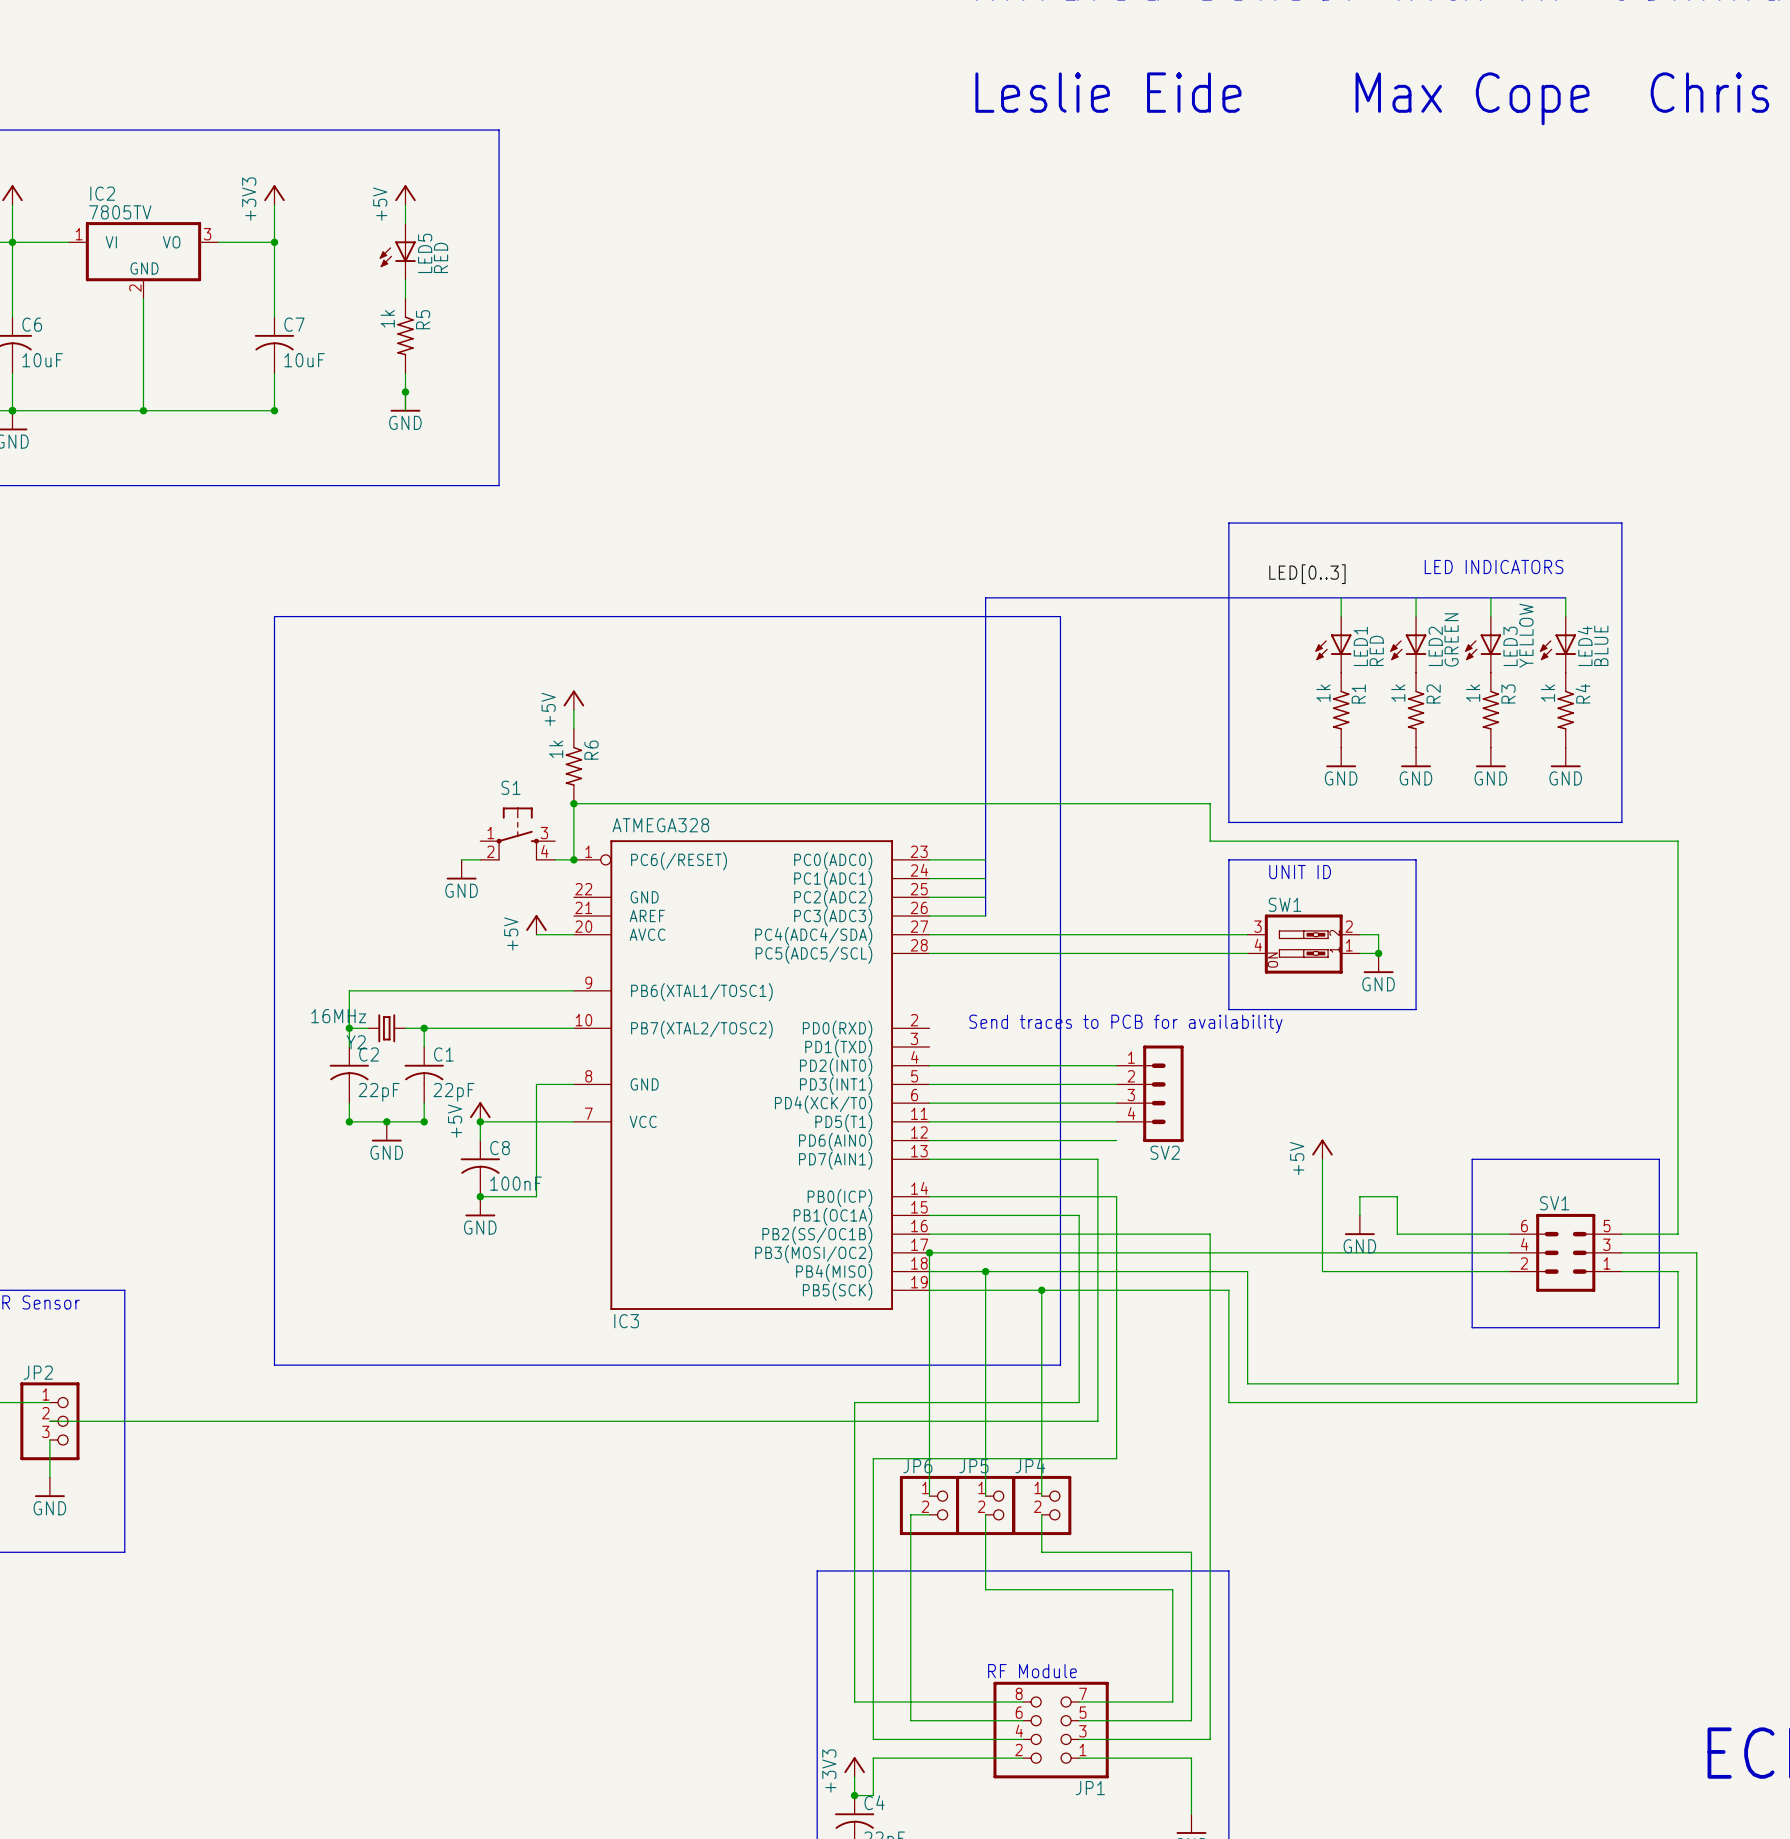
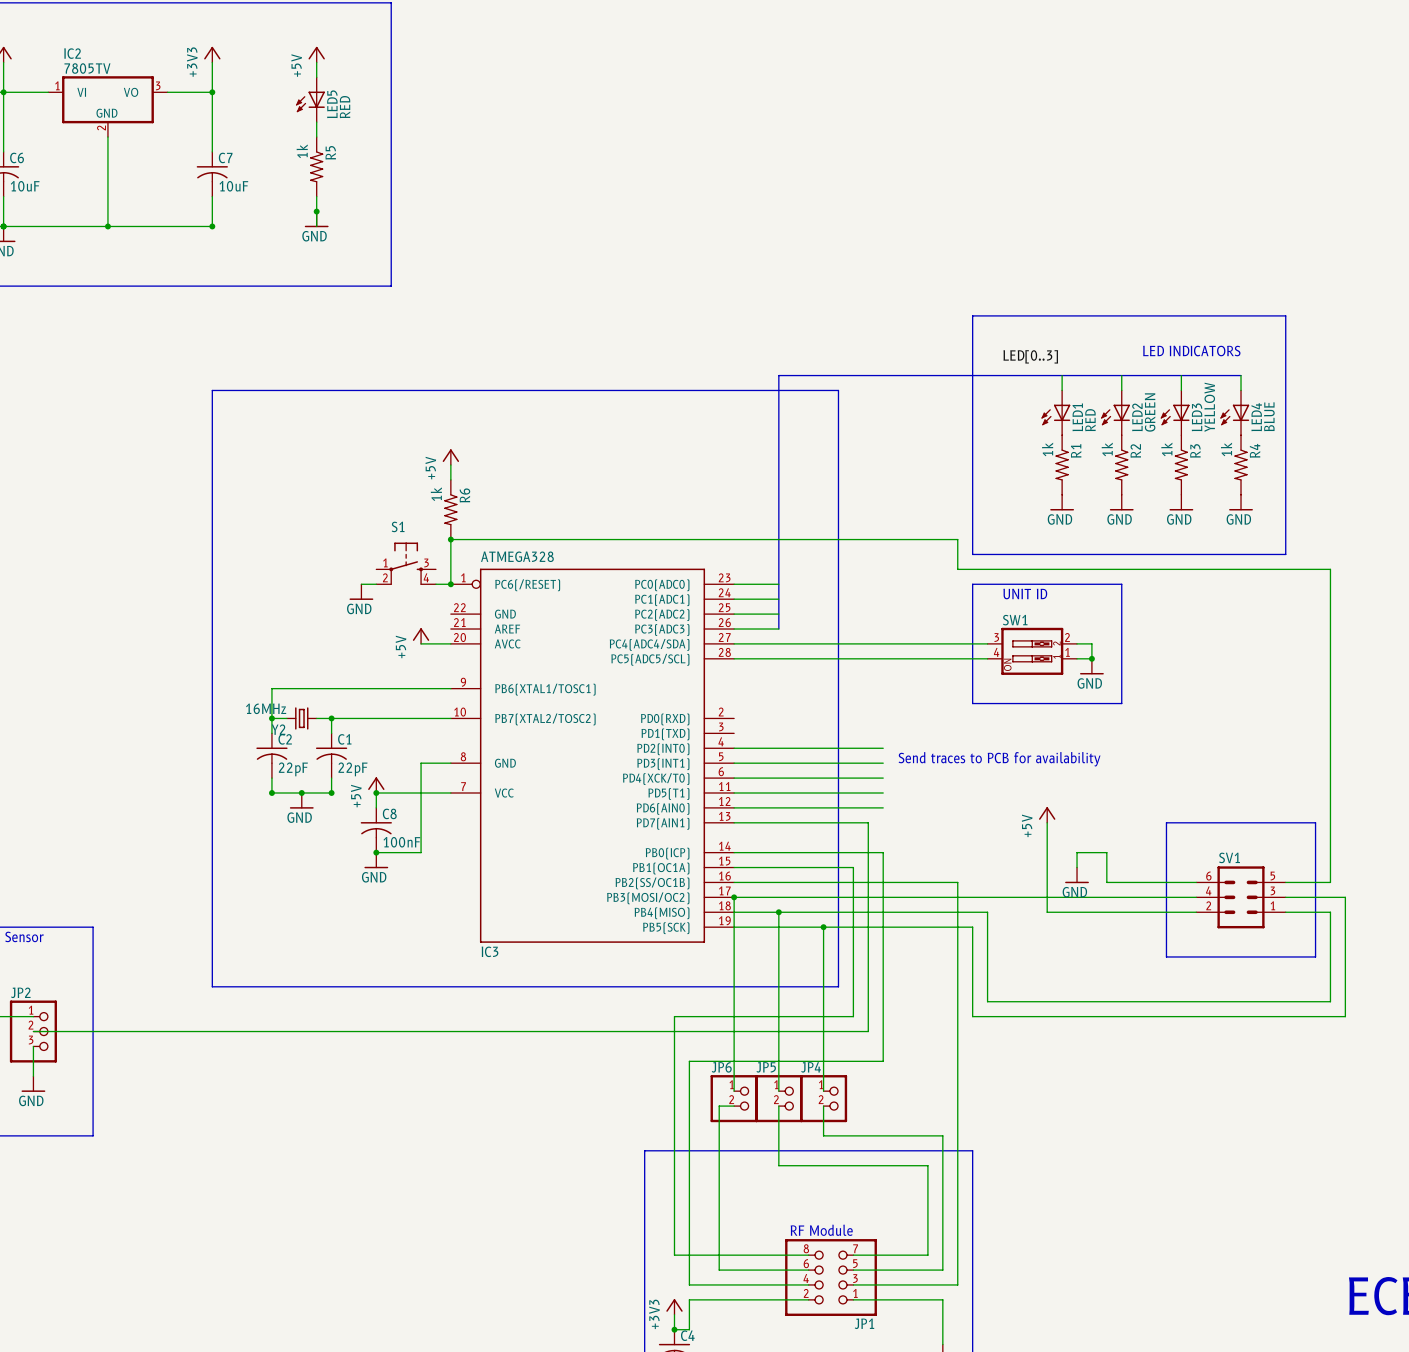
text position: Send traces to PCB for availability (1125, 1023) -> Send traces to PCB for availability (999, 759)
SV2: (1150, 1093) -> none

